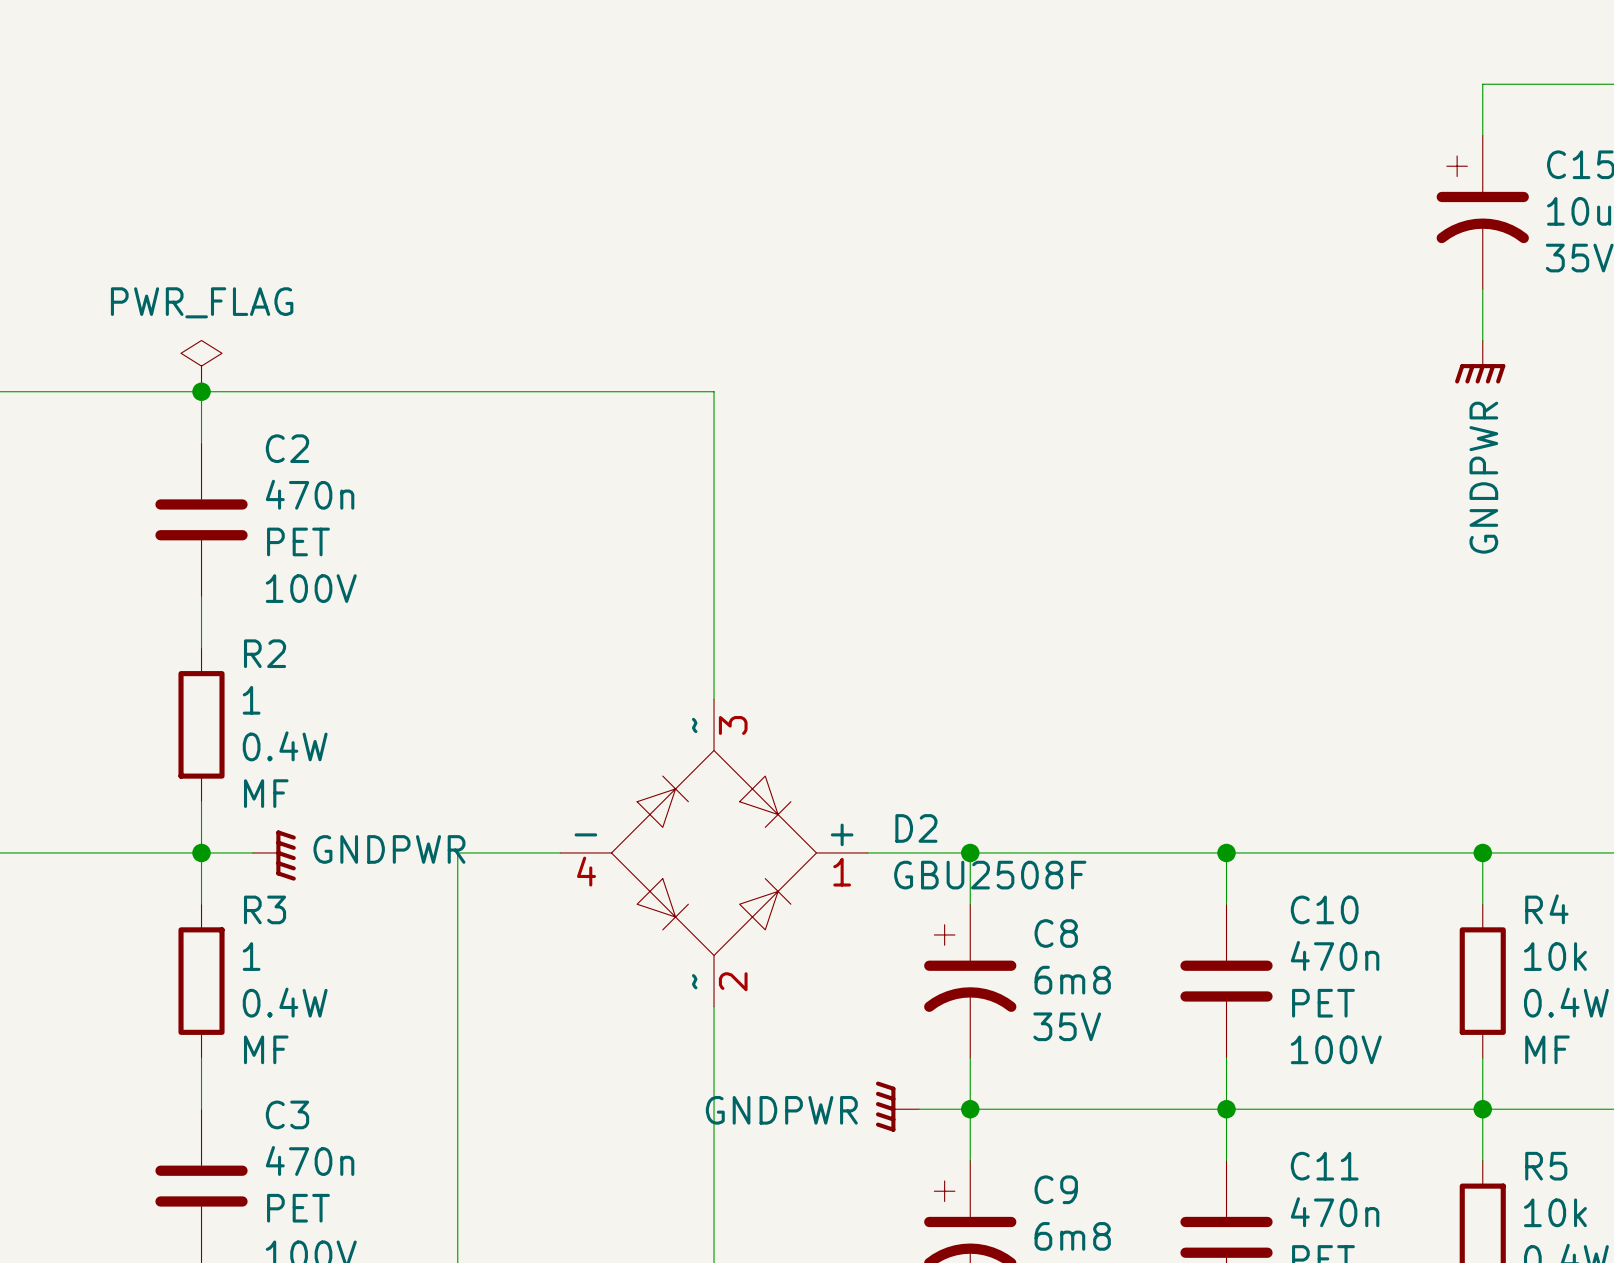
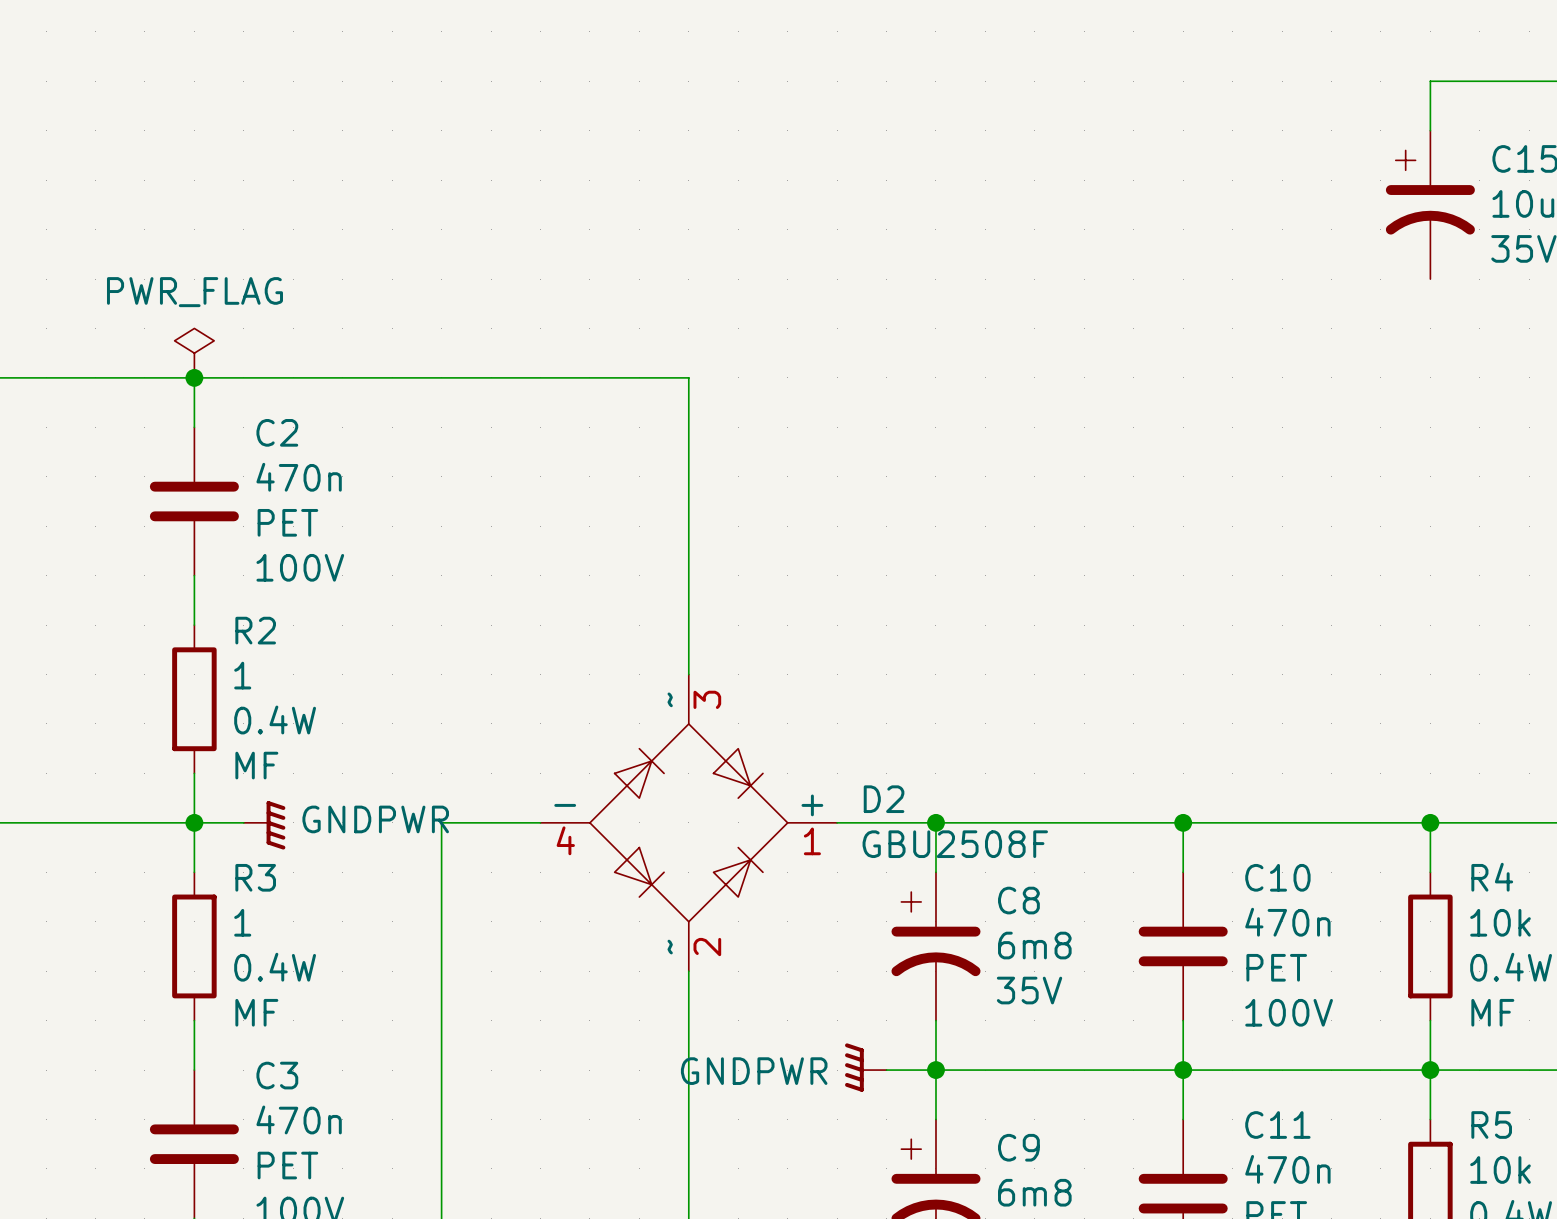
wire: (1482, 289) (1482, 340) -> none
power symbol: GNDPWR (1480, 362) -> none

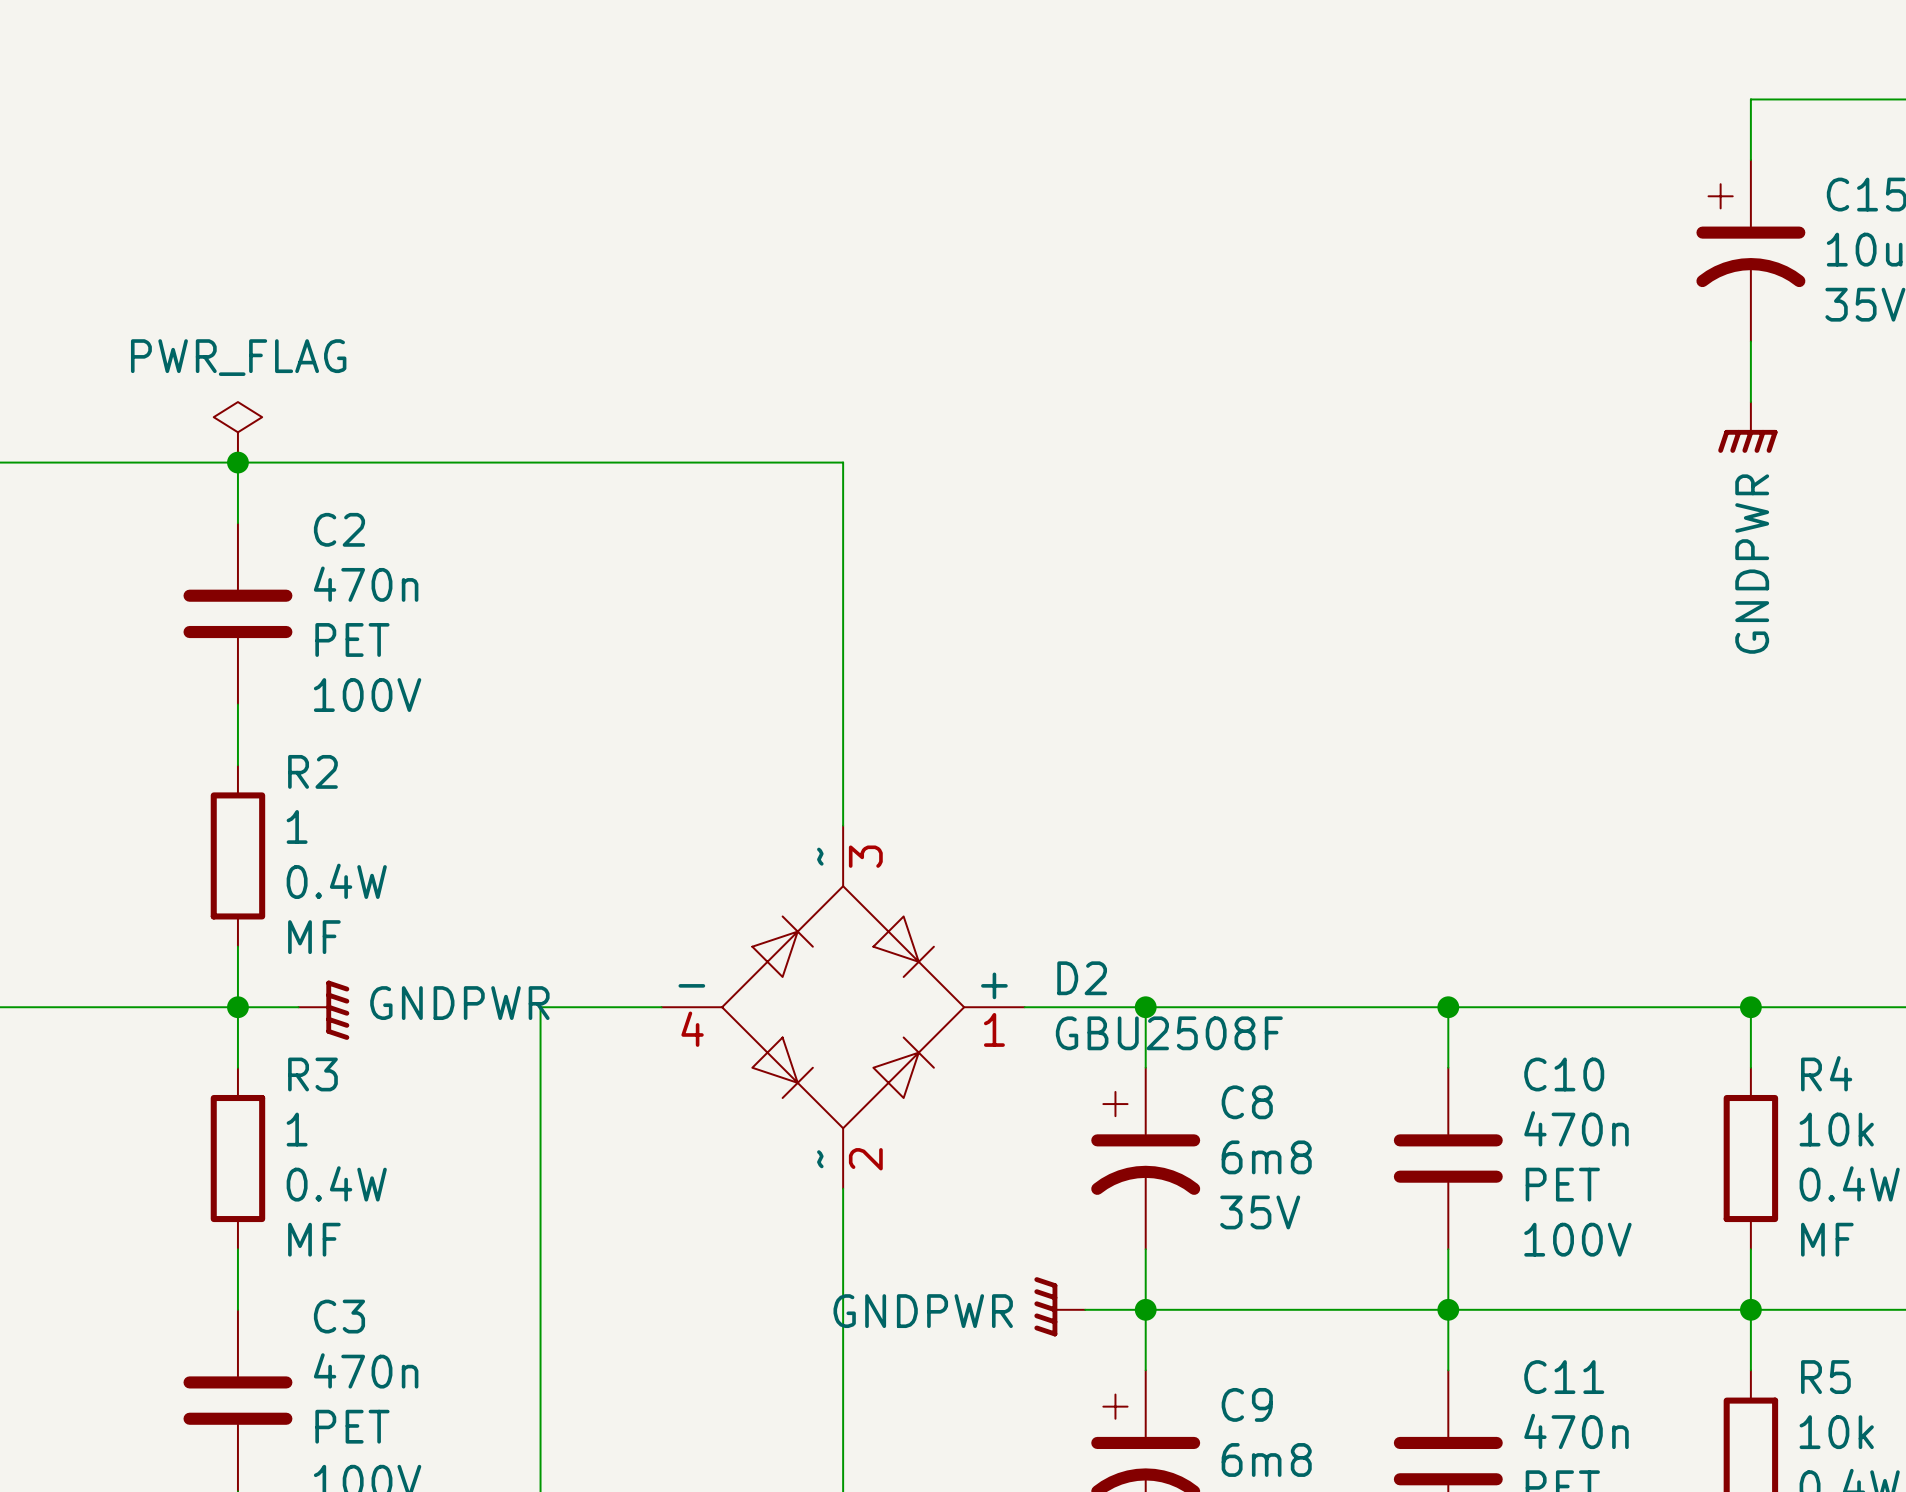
wire: none -> (1750, 341) (1750, 402)
power symbol: none -> GNDPWR (1747, 427)

